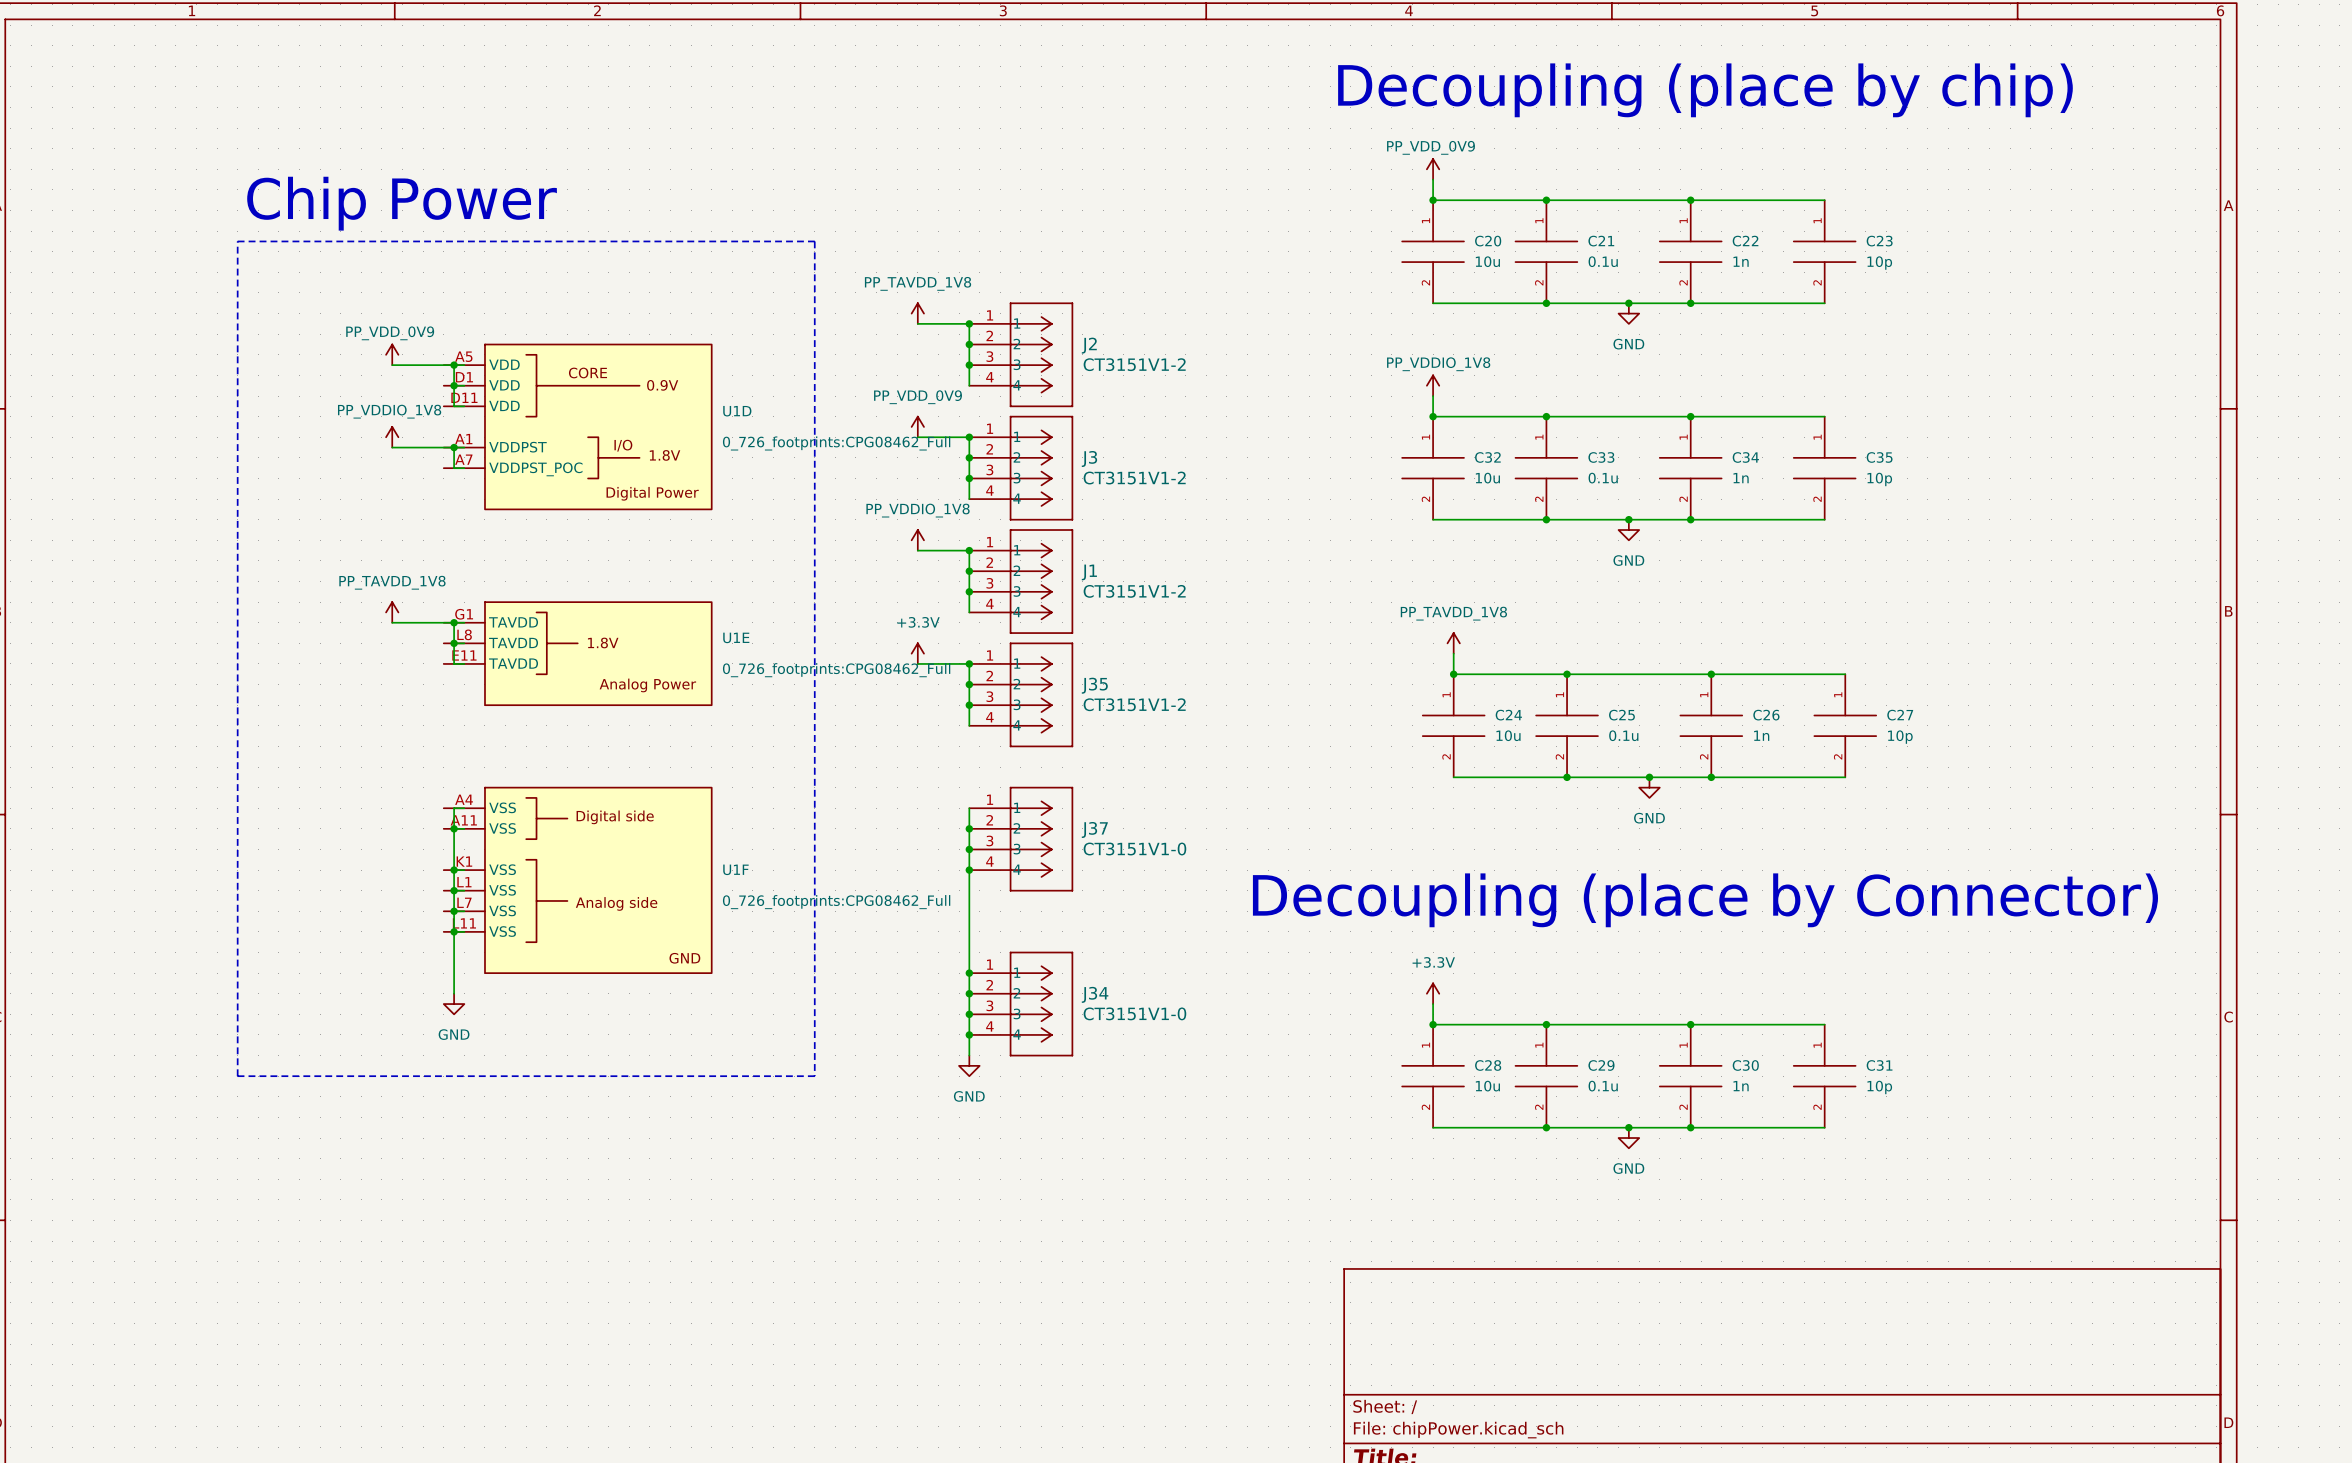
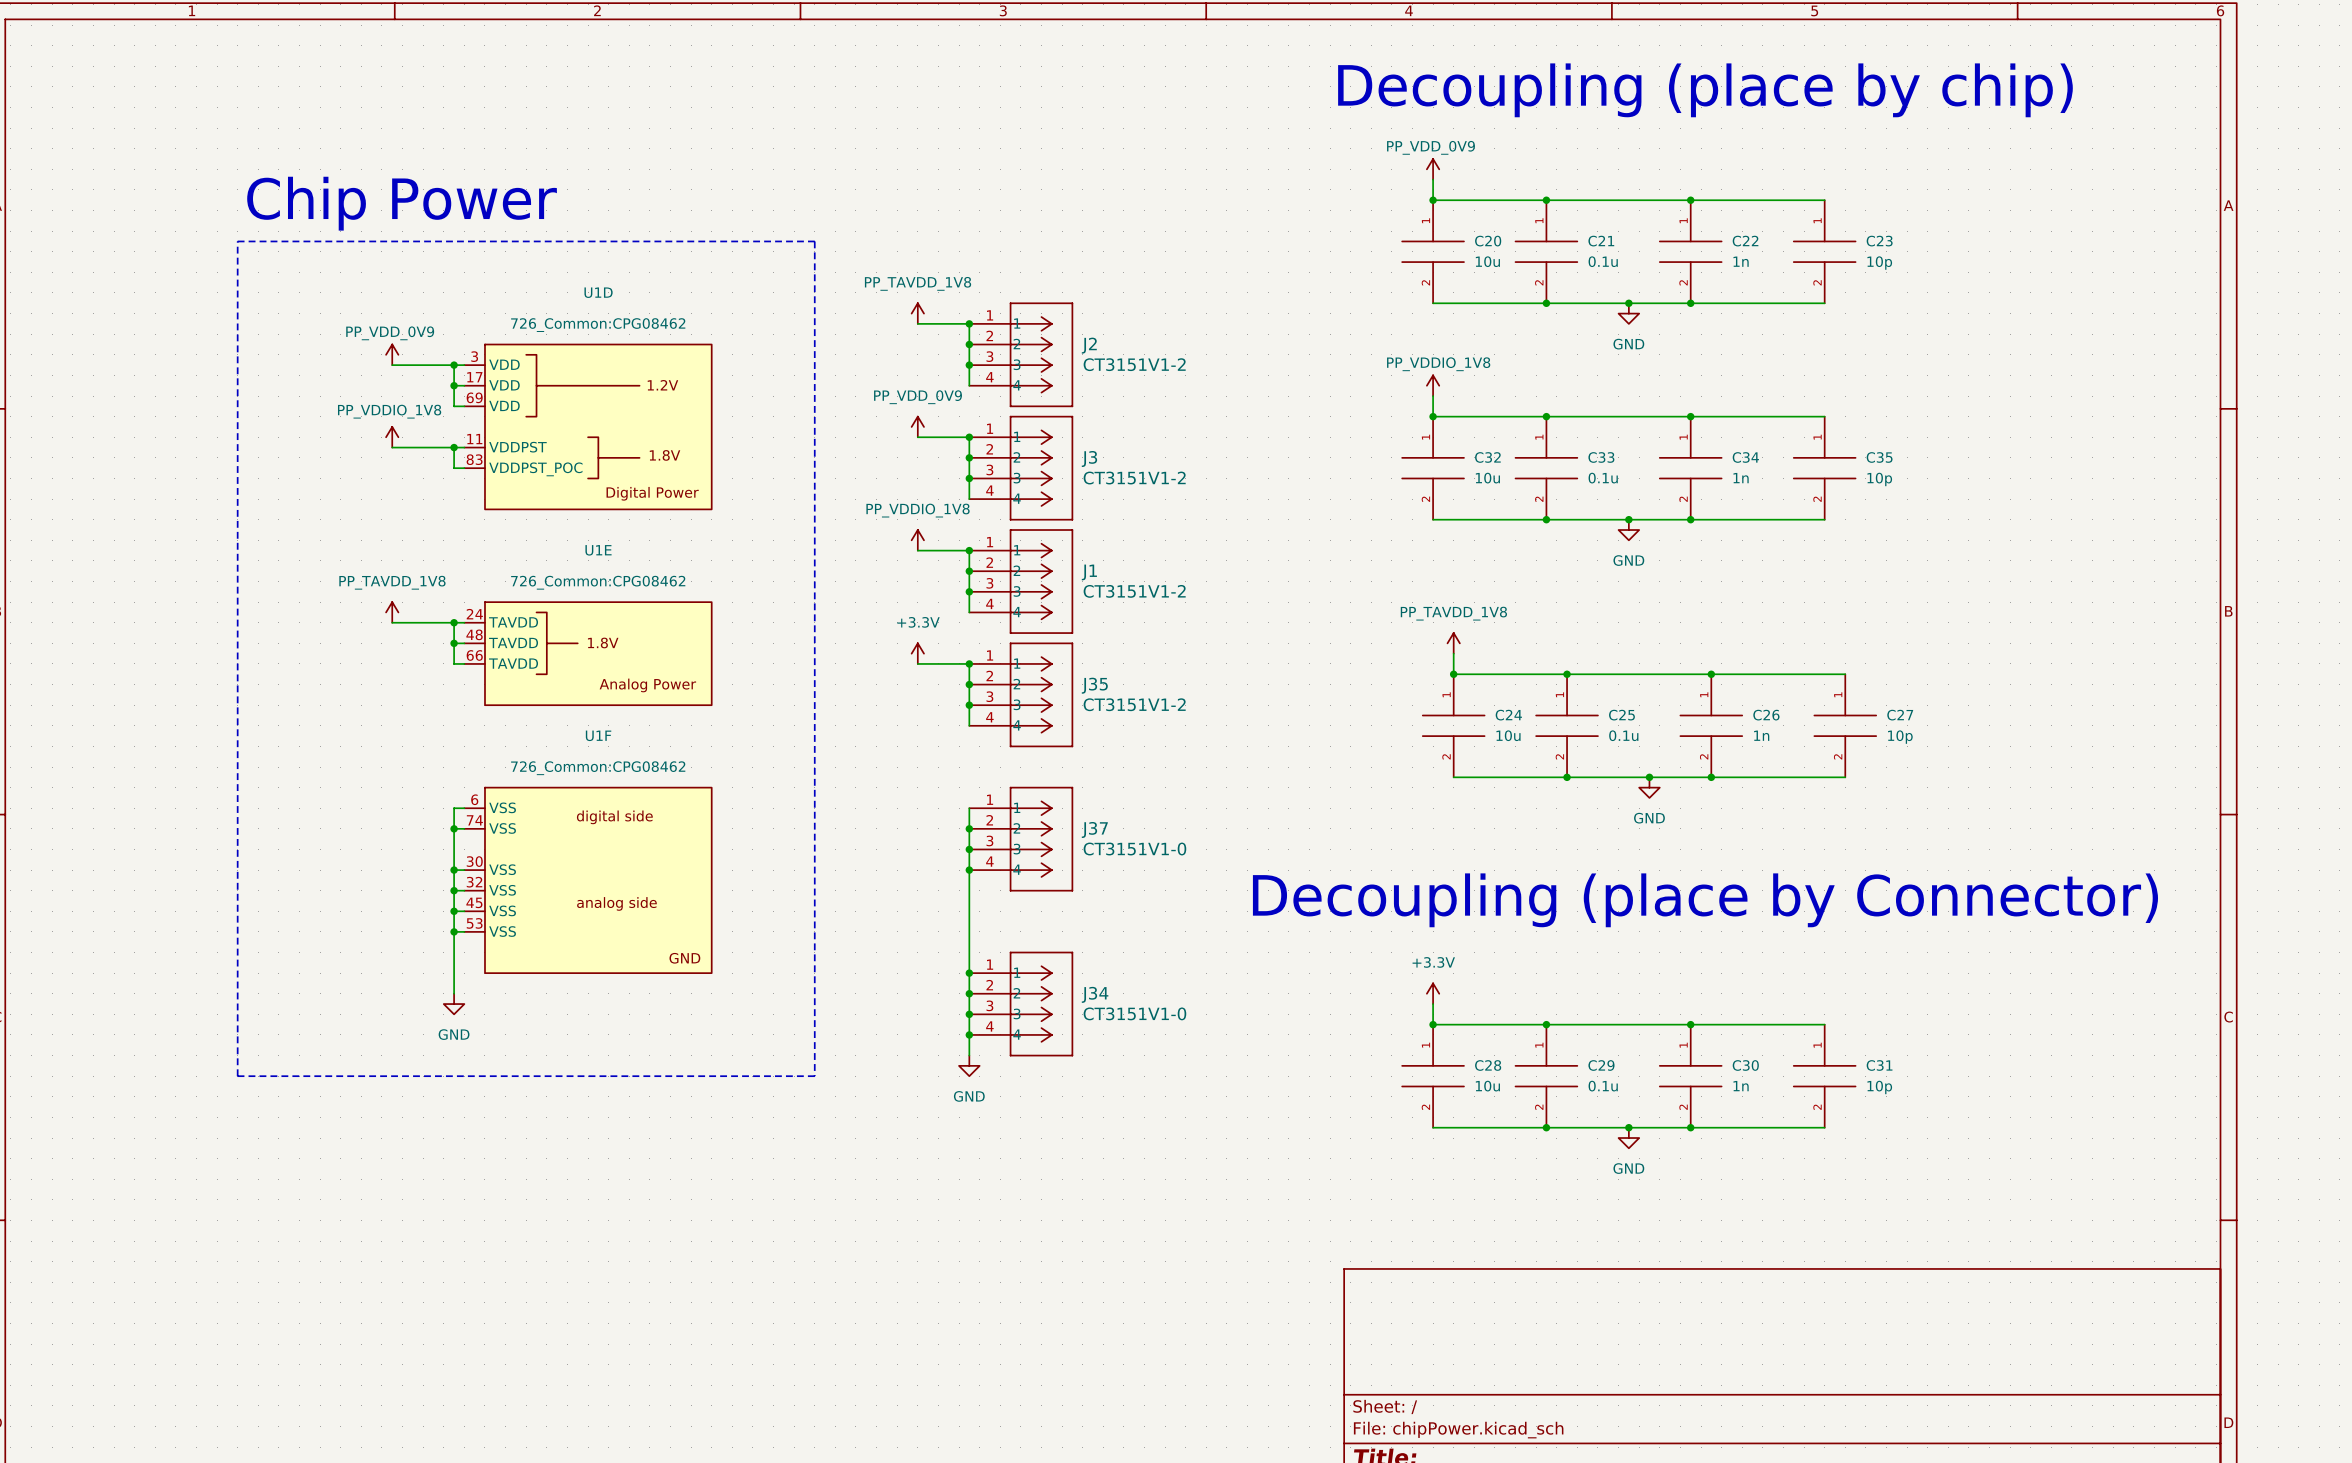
U1D symbol: [443, 344, 712, 510] -> [464, 344, 712, 510]
U1D name position: U1D (737, 411) -> U1D (598, 292)
U1D text: 0_726_footprints:CPG08462_Full (836, 443) -> 726_Common:CPG08462 (598, 325)
U1E symbol: [443, 602, 712, 706] -> [464, 602, 712, 706]
U1E name position: U1E (736, 637) -> U1E (598, 550)
U1E text: 0_726_footprints:CPG08462_Full (836, 670) -> 726_Common:CPG08462 (598, 582)
U1F symbol: [443, 787, 712, 974] -> [464, 787, 712, 974]
U1F name position: U1F (735, 869) -> U1F (598, 735)
U1F text: 0_726_footprints:CPG08462_Full (836, 902) -> 726_Common:CPG08462 (598, 768)

